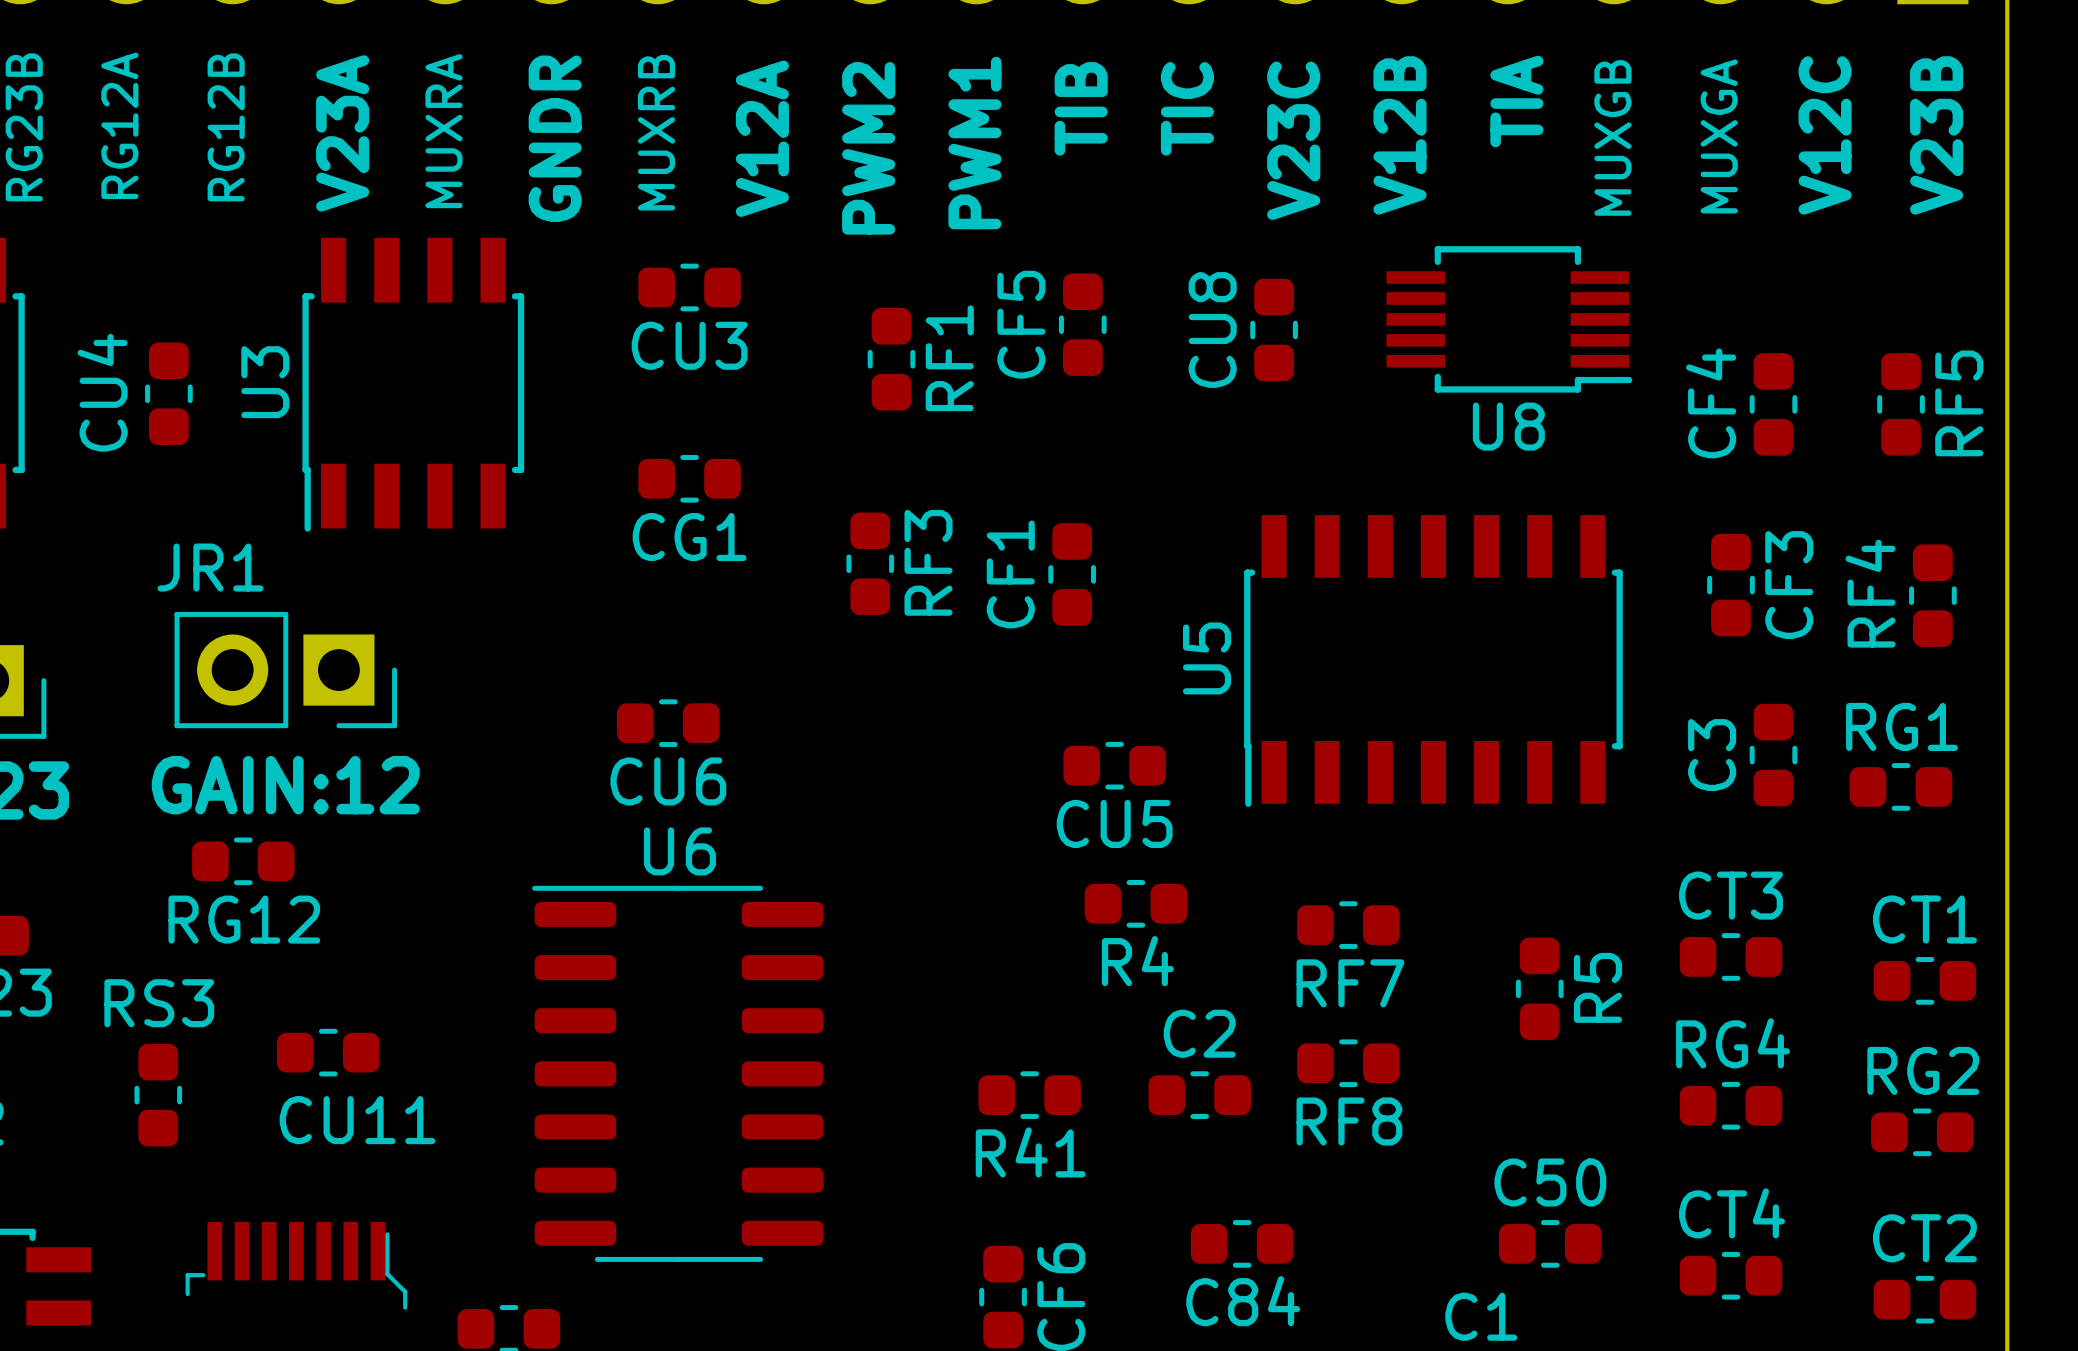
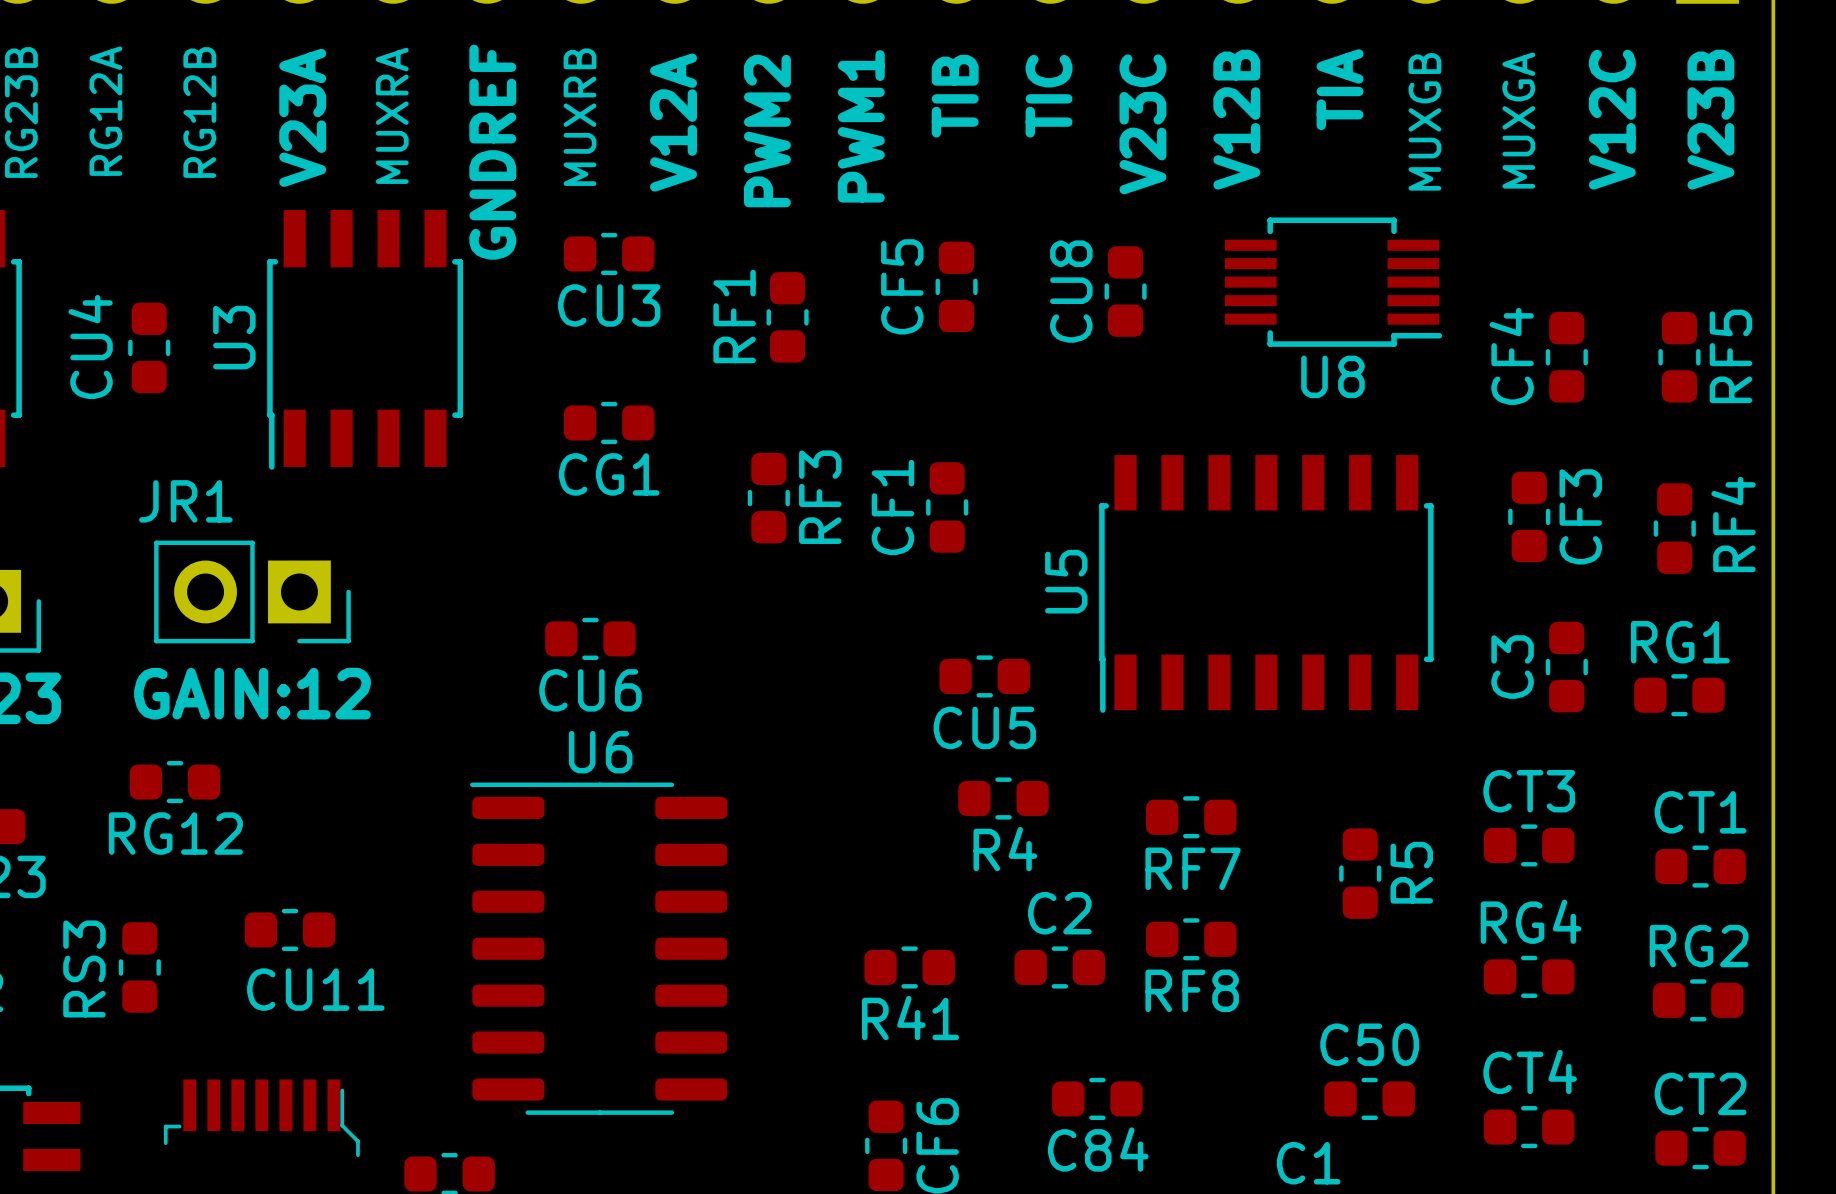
text: GNDR (555, 138) -> GNDREF (492, 152)
RF1 name position: RF1 (949, 358) -> RF1 (734, 316)
RF4 name position: RF4 (1870, 593) -> RF4 (1733, 524)
RF4 position: (1932, 595) -> (1674, 528)
RG12 position: (243, 861) -> (175, 782)
RS3 name rotation: 0° (159, 1003) -> 90° counterclockwise (84, 968)

